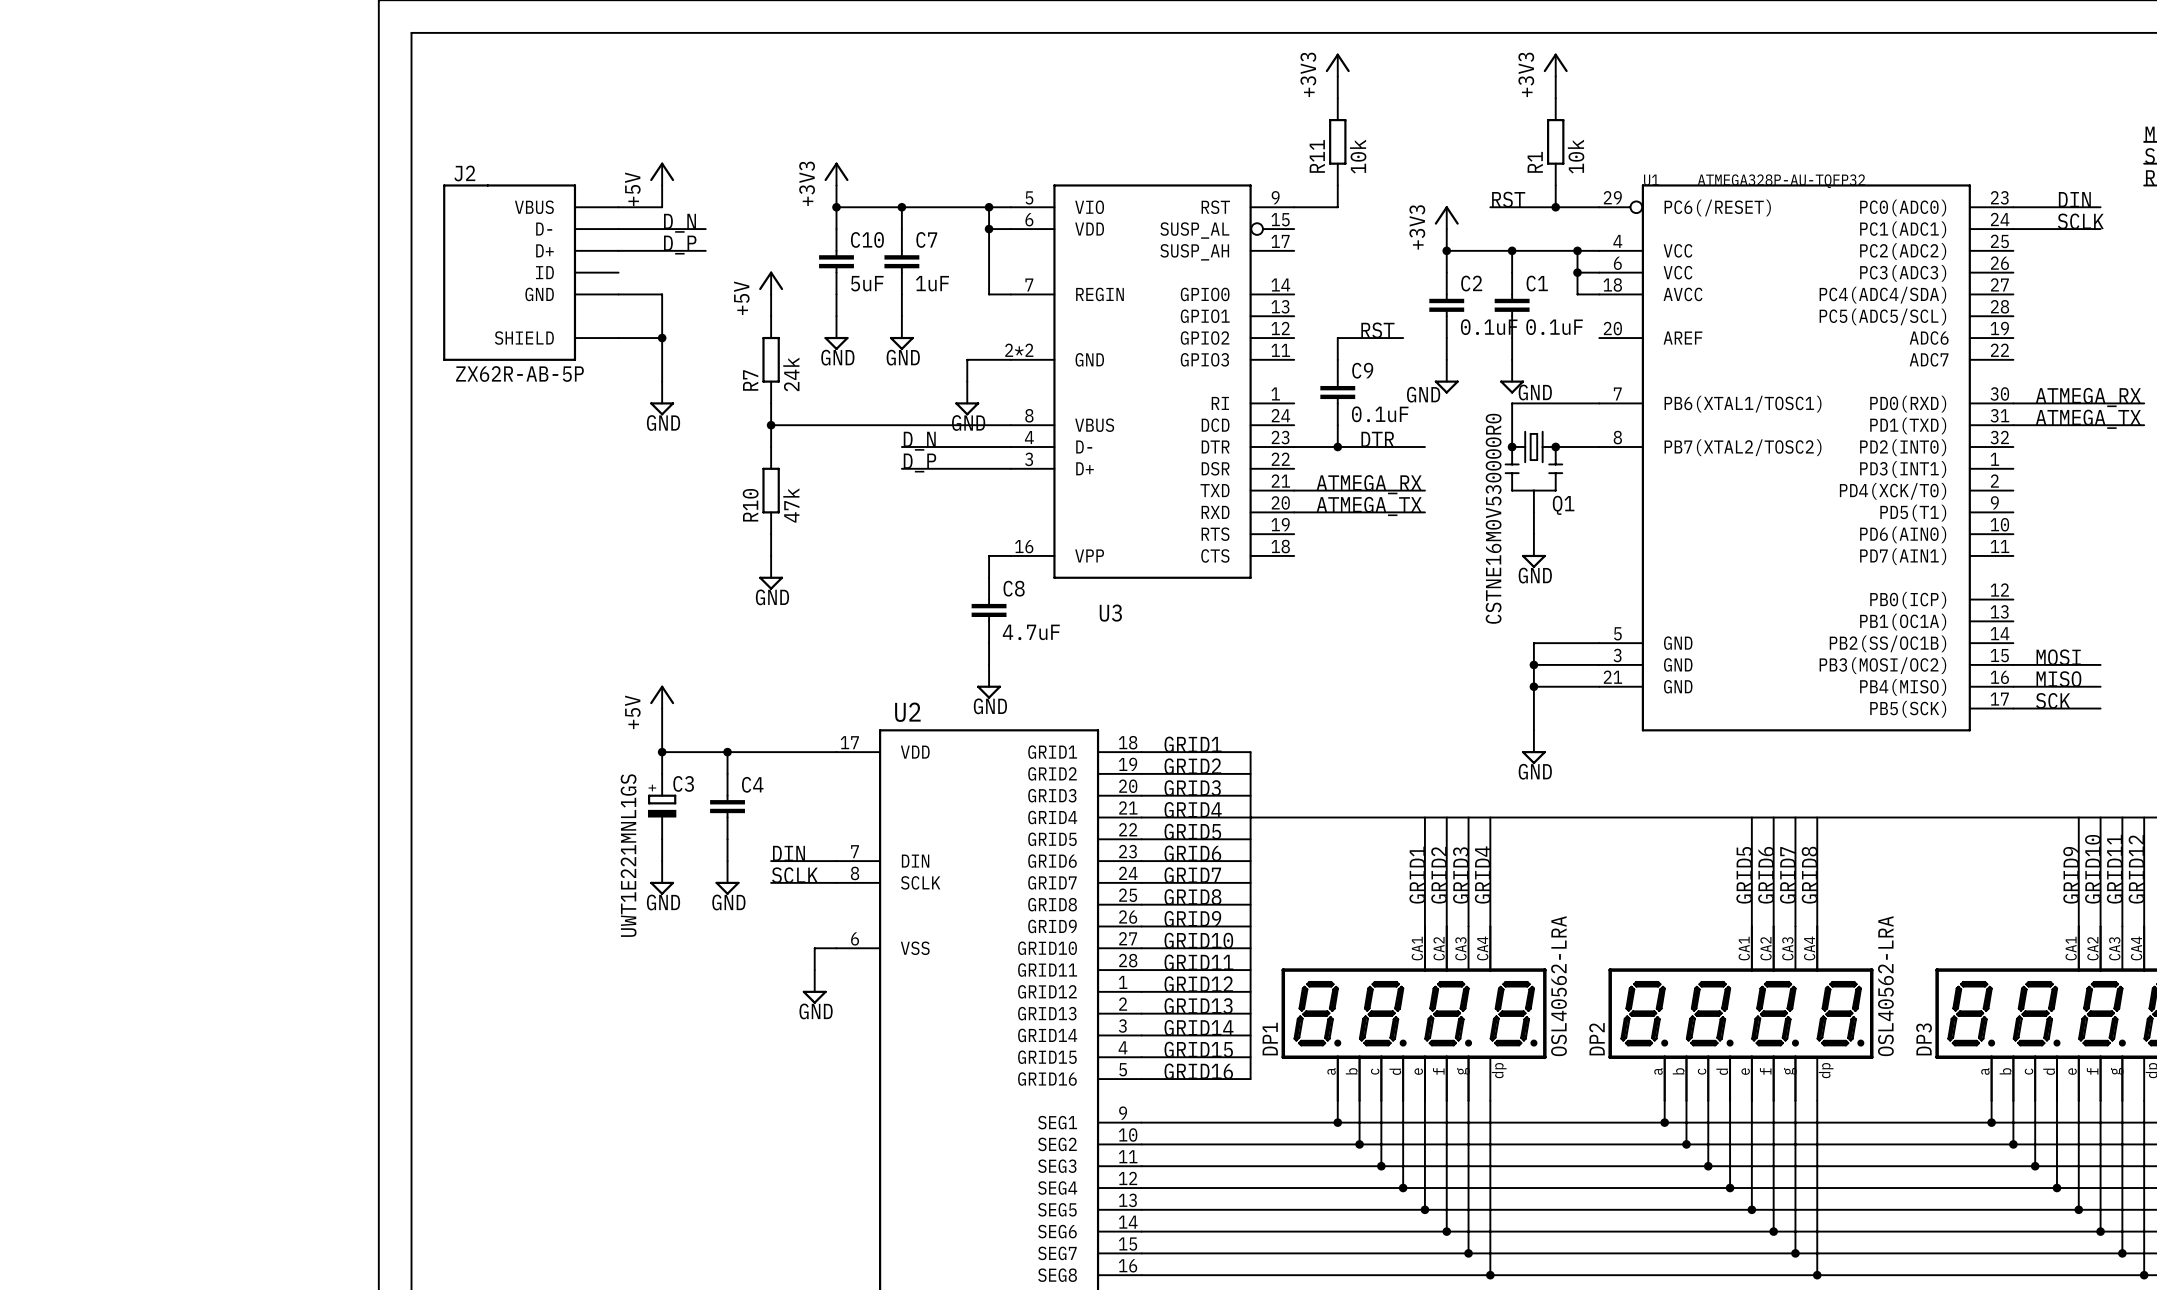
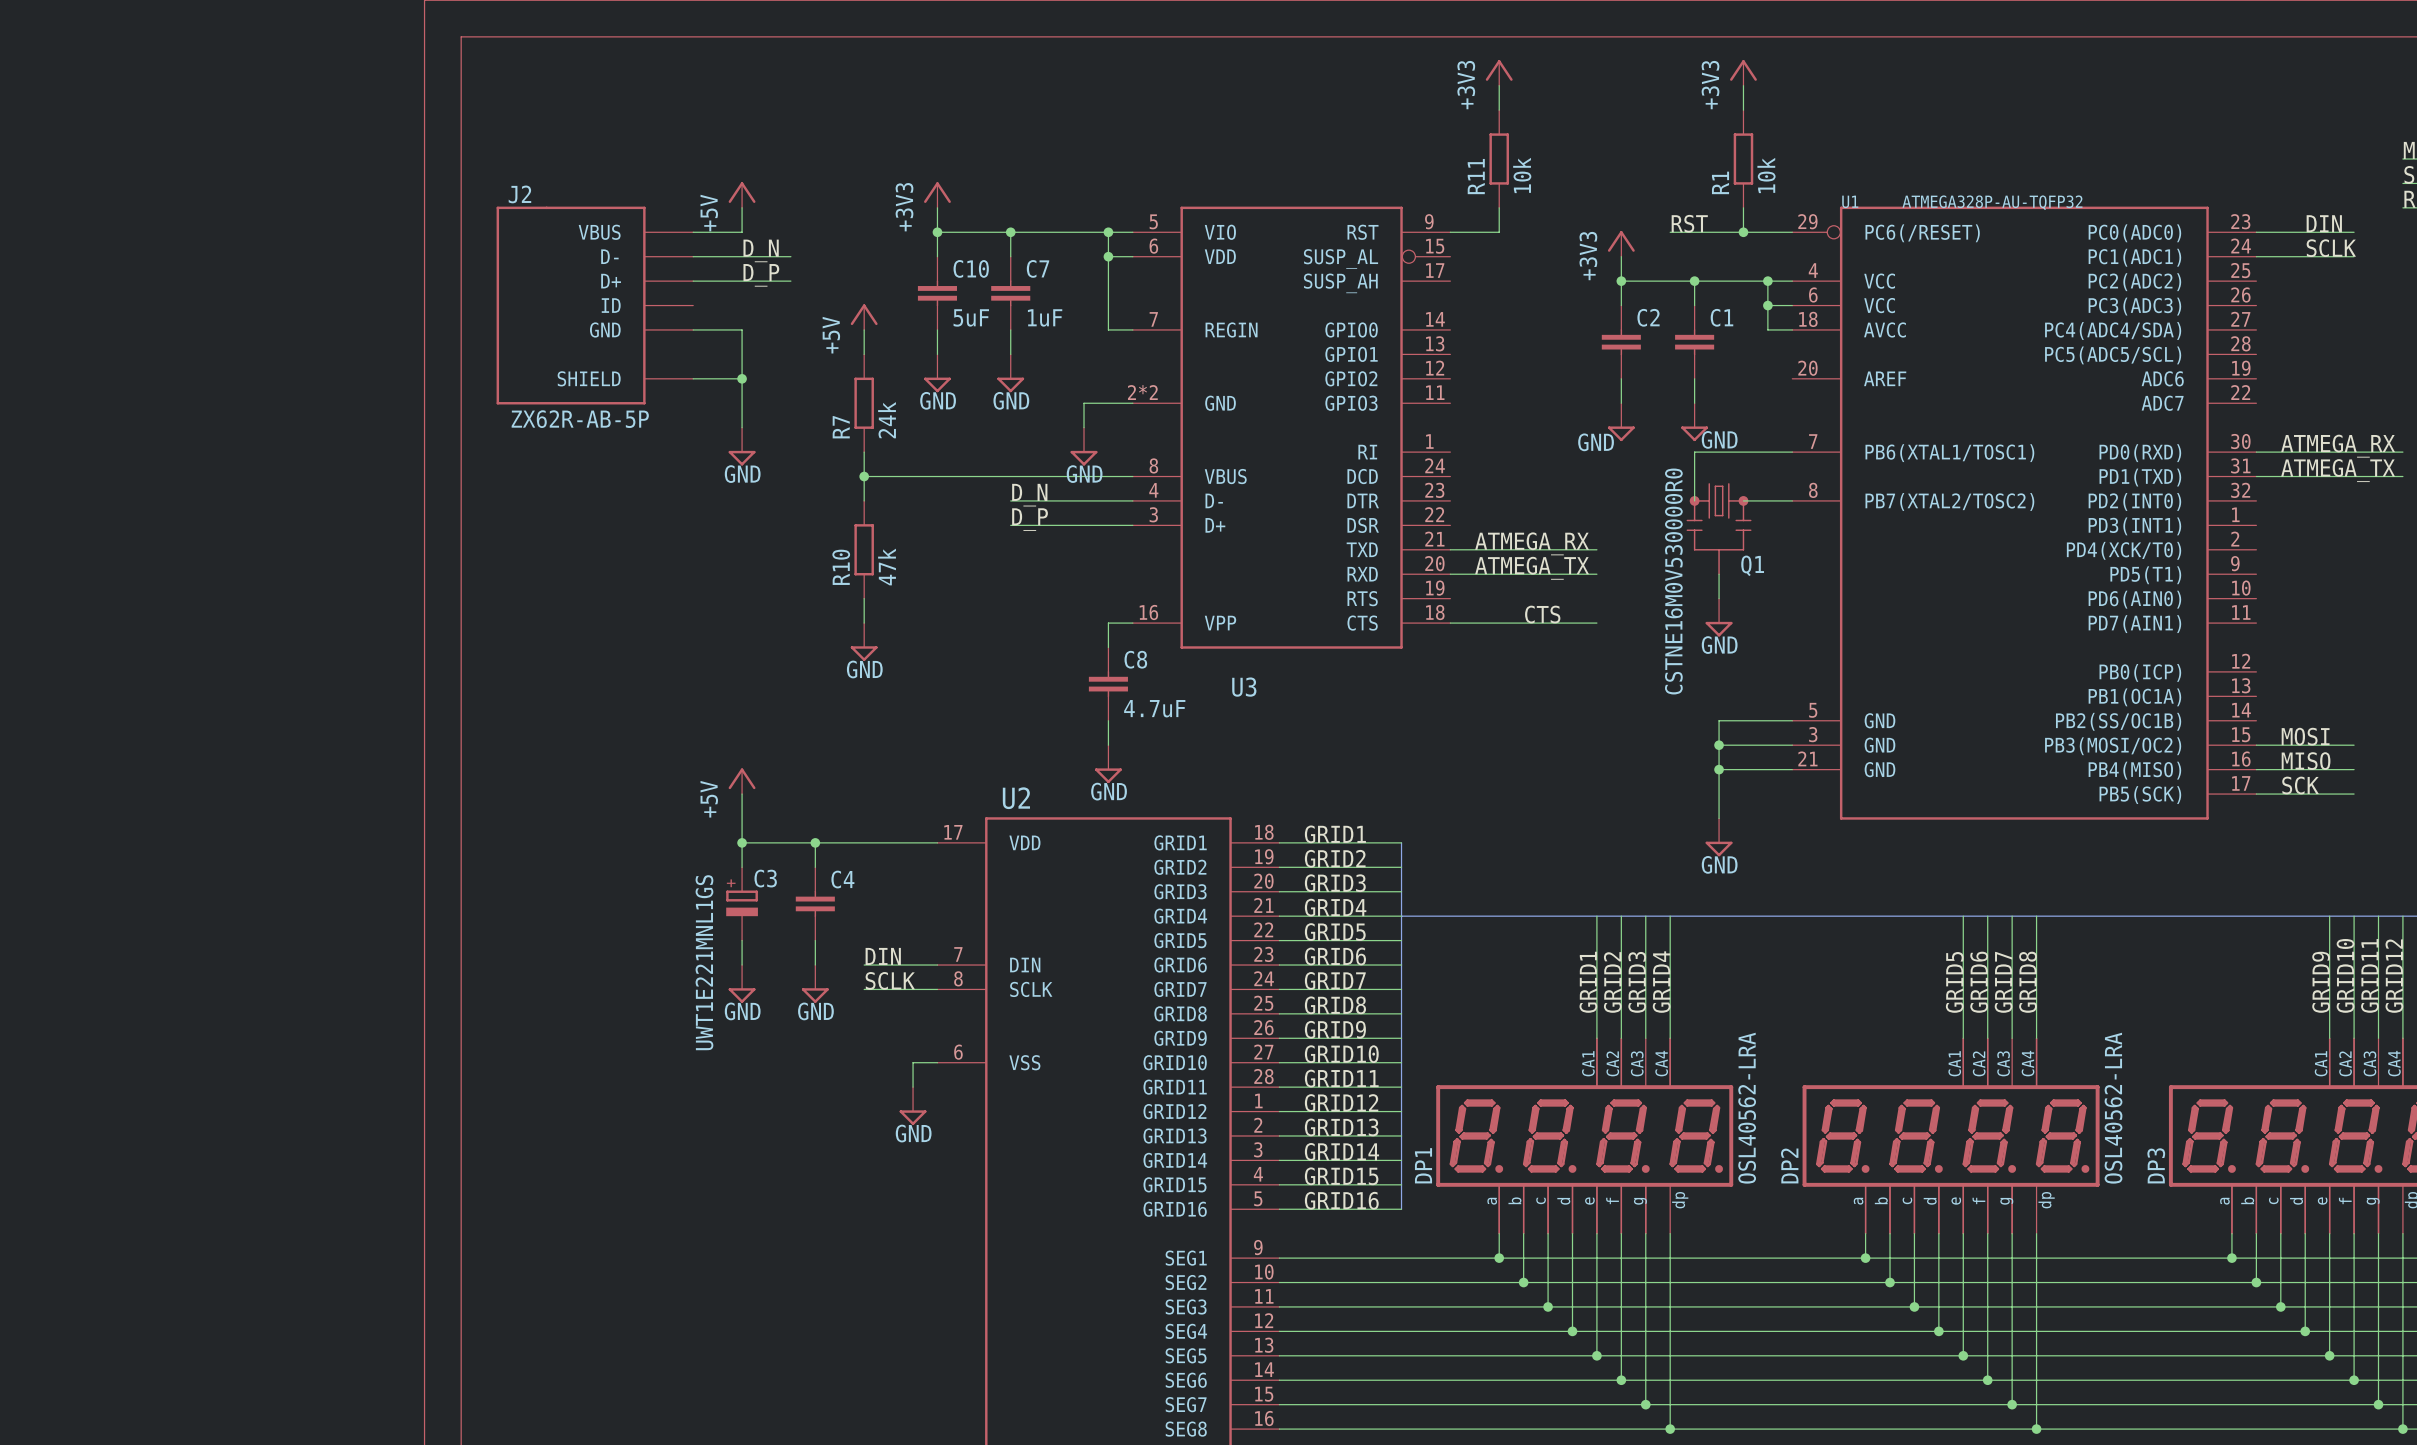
C2 value: 0.1uF (1489, 327) -> none
C1 value: 0.1uF (1554, 327) -> none
label: RST (1377, 330) -> none
wire: (1403, 338) (1337, 338) (1337, 359) -> none
C9: 0.1uF (1337, 392) -> none
wire: (1337, 425) (1337, 447) -> none
label: DTR (1377, 439) -> none
wire: (1294, 447) (1424, 447) -> (1450, 623) (1596, 623)
junction: (1337, 447) -> none
label: none -> CTS (1542, 614)

